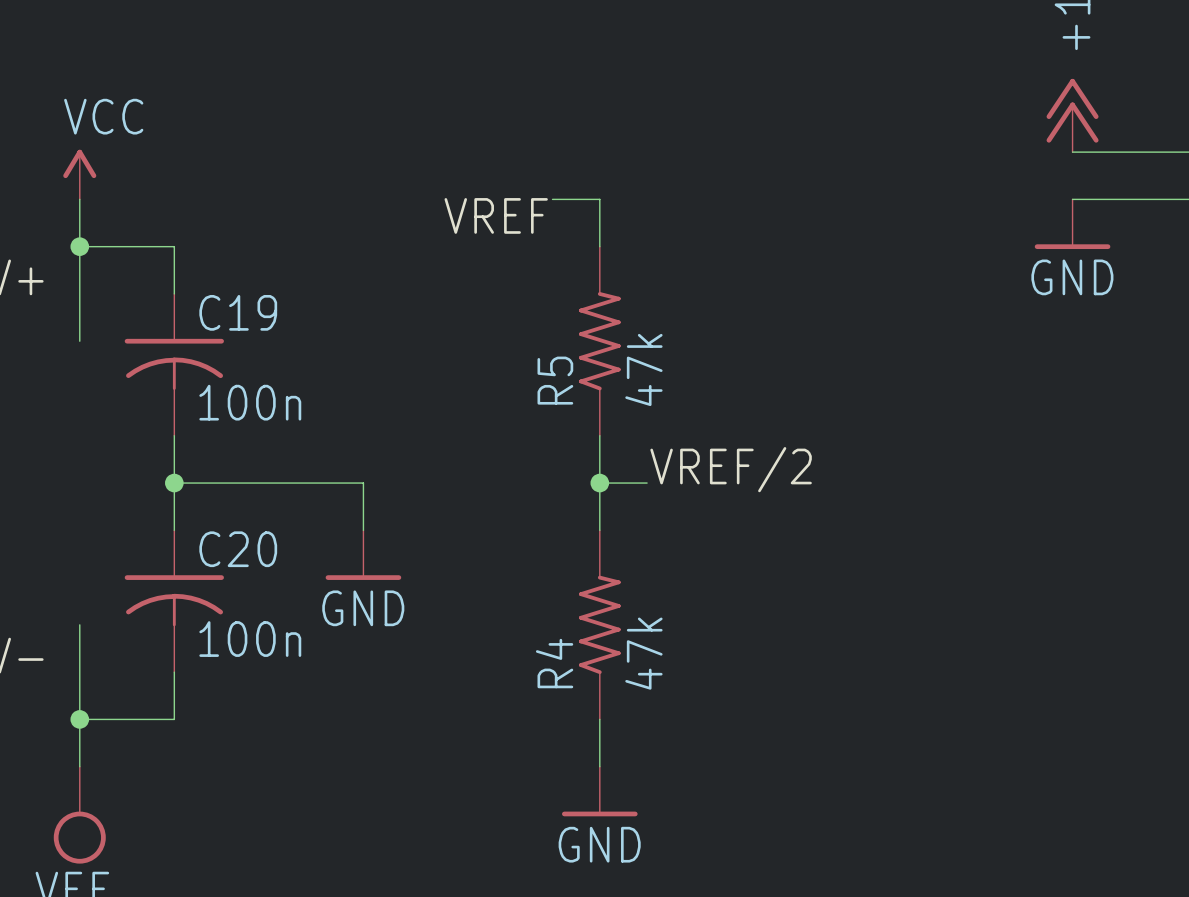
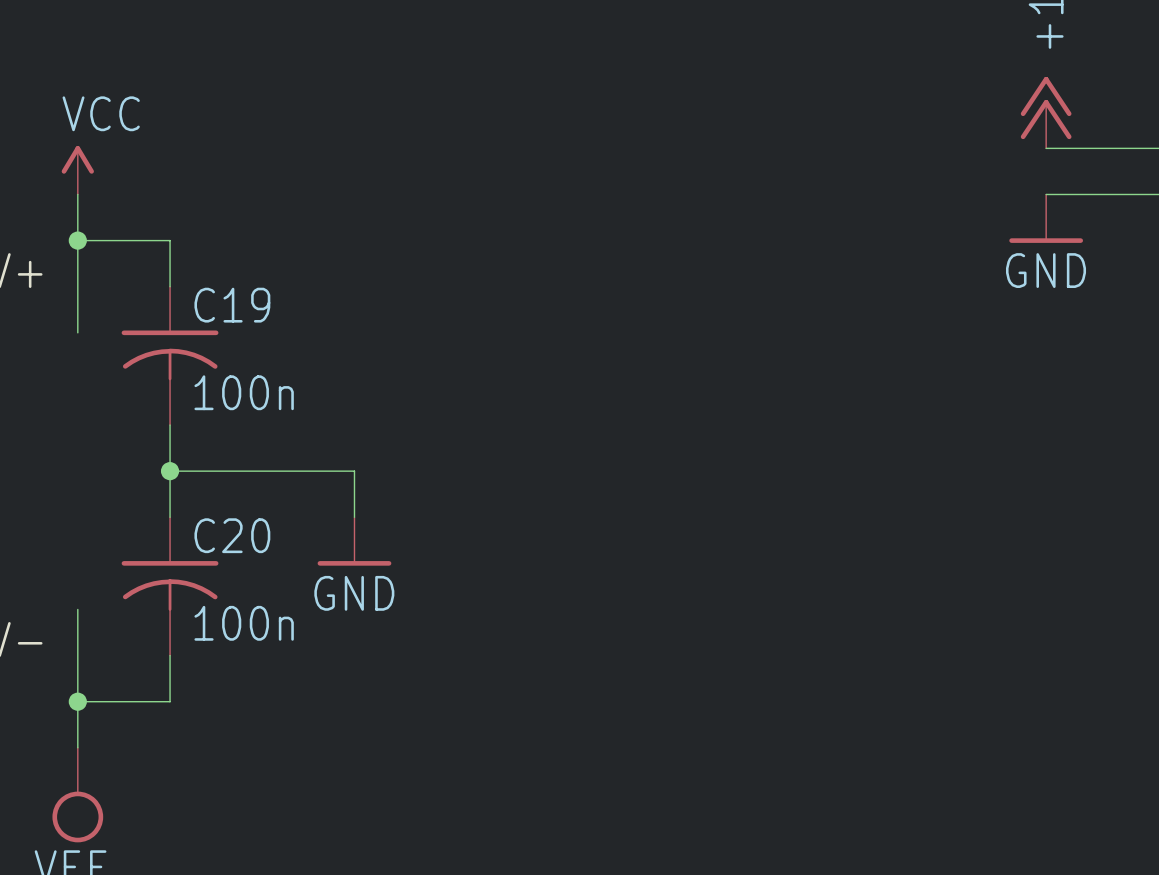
wire: (552, 199) (599, 199) (599, 246) -> none
label: VREF (496, 215) -> none
R5: 47k (599, 341) -> none
wire: (599, 435) (599, 530) -> none
label: VREF/2 (731, 469) -> none
wire: (599, 483) (647, 483) -> none
junction: (599, 483) -> none
R4: 47k (599, 624) -> none
wire: (599, 719) (599, 766) -> none
power symbol: GND (599, 791) -> none

